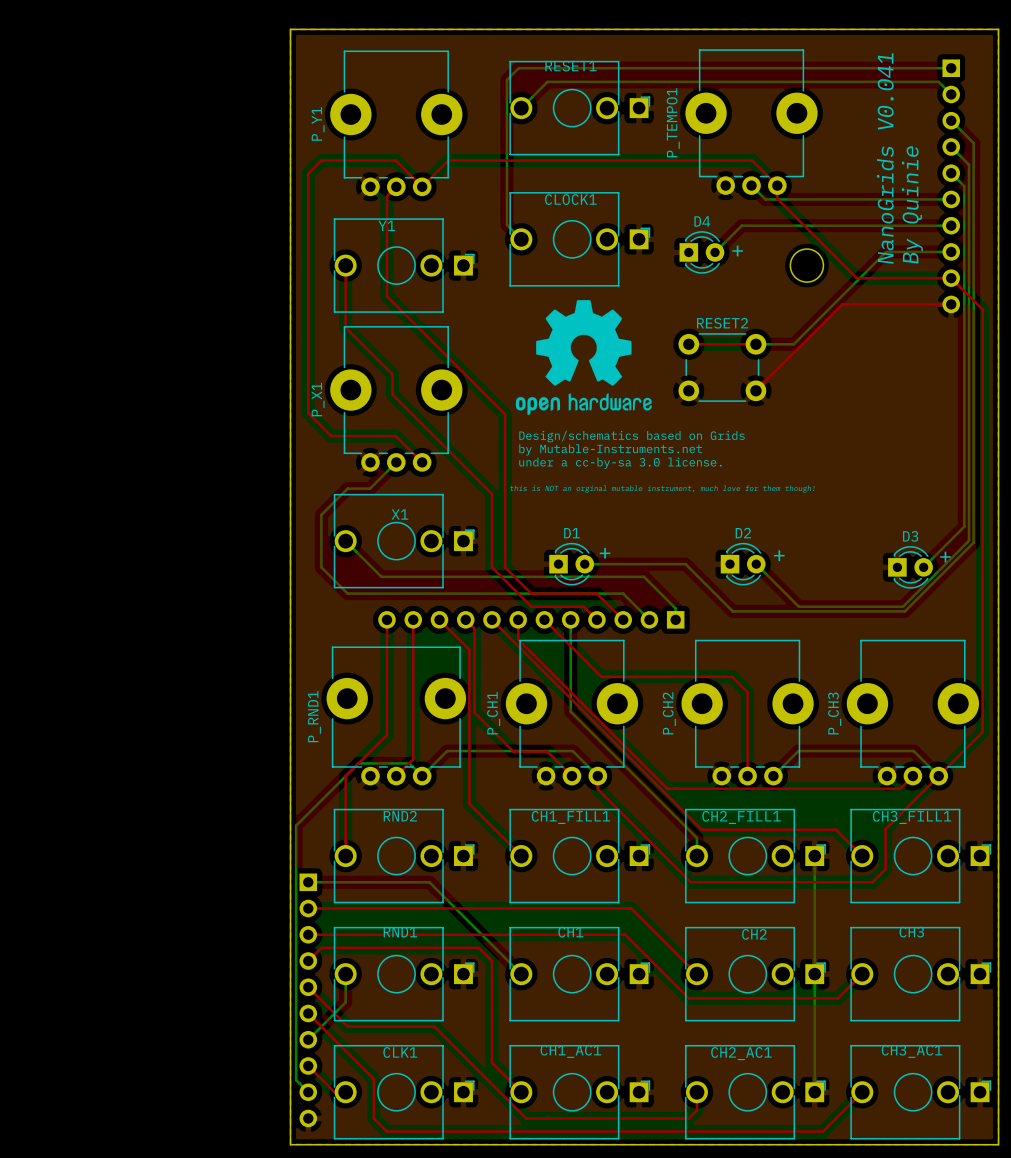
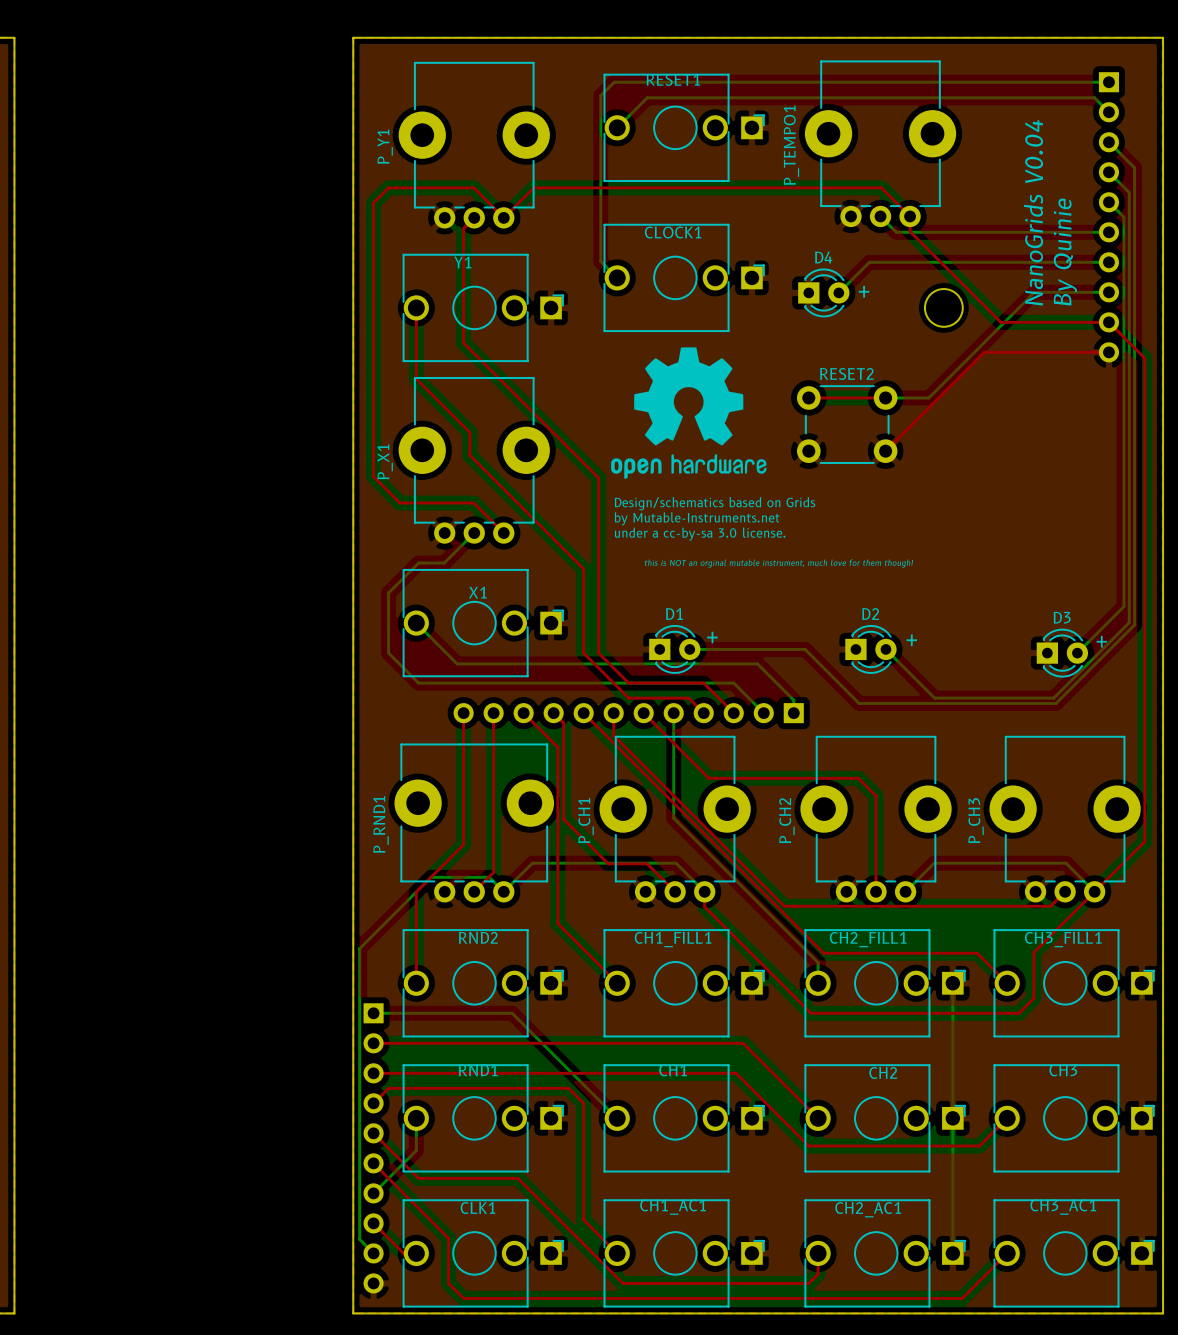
text: NanoGrids V0.041 (885, 158) -> NanoGrids V0.04 (1033, 212)

